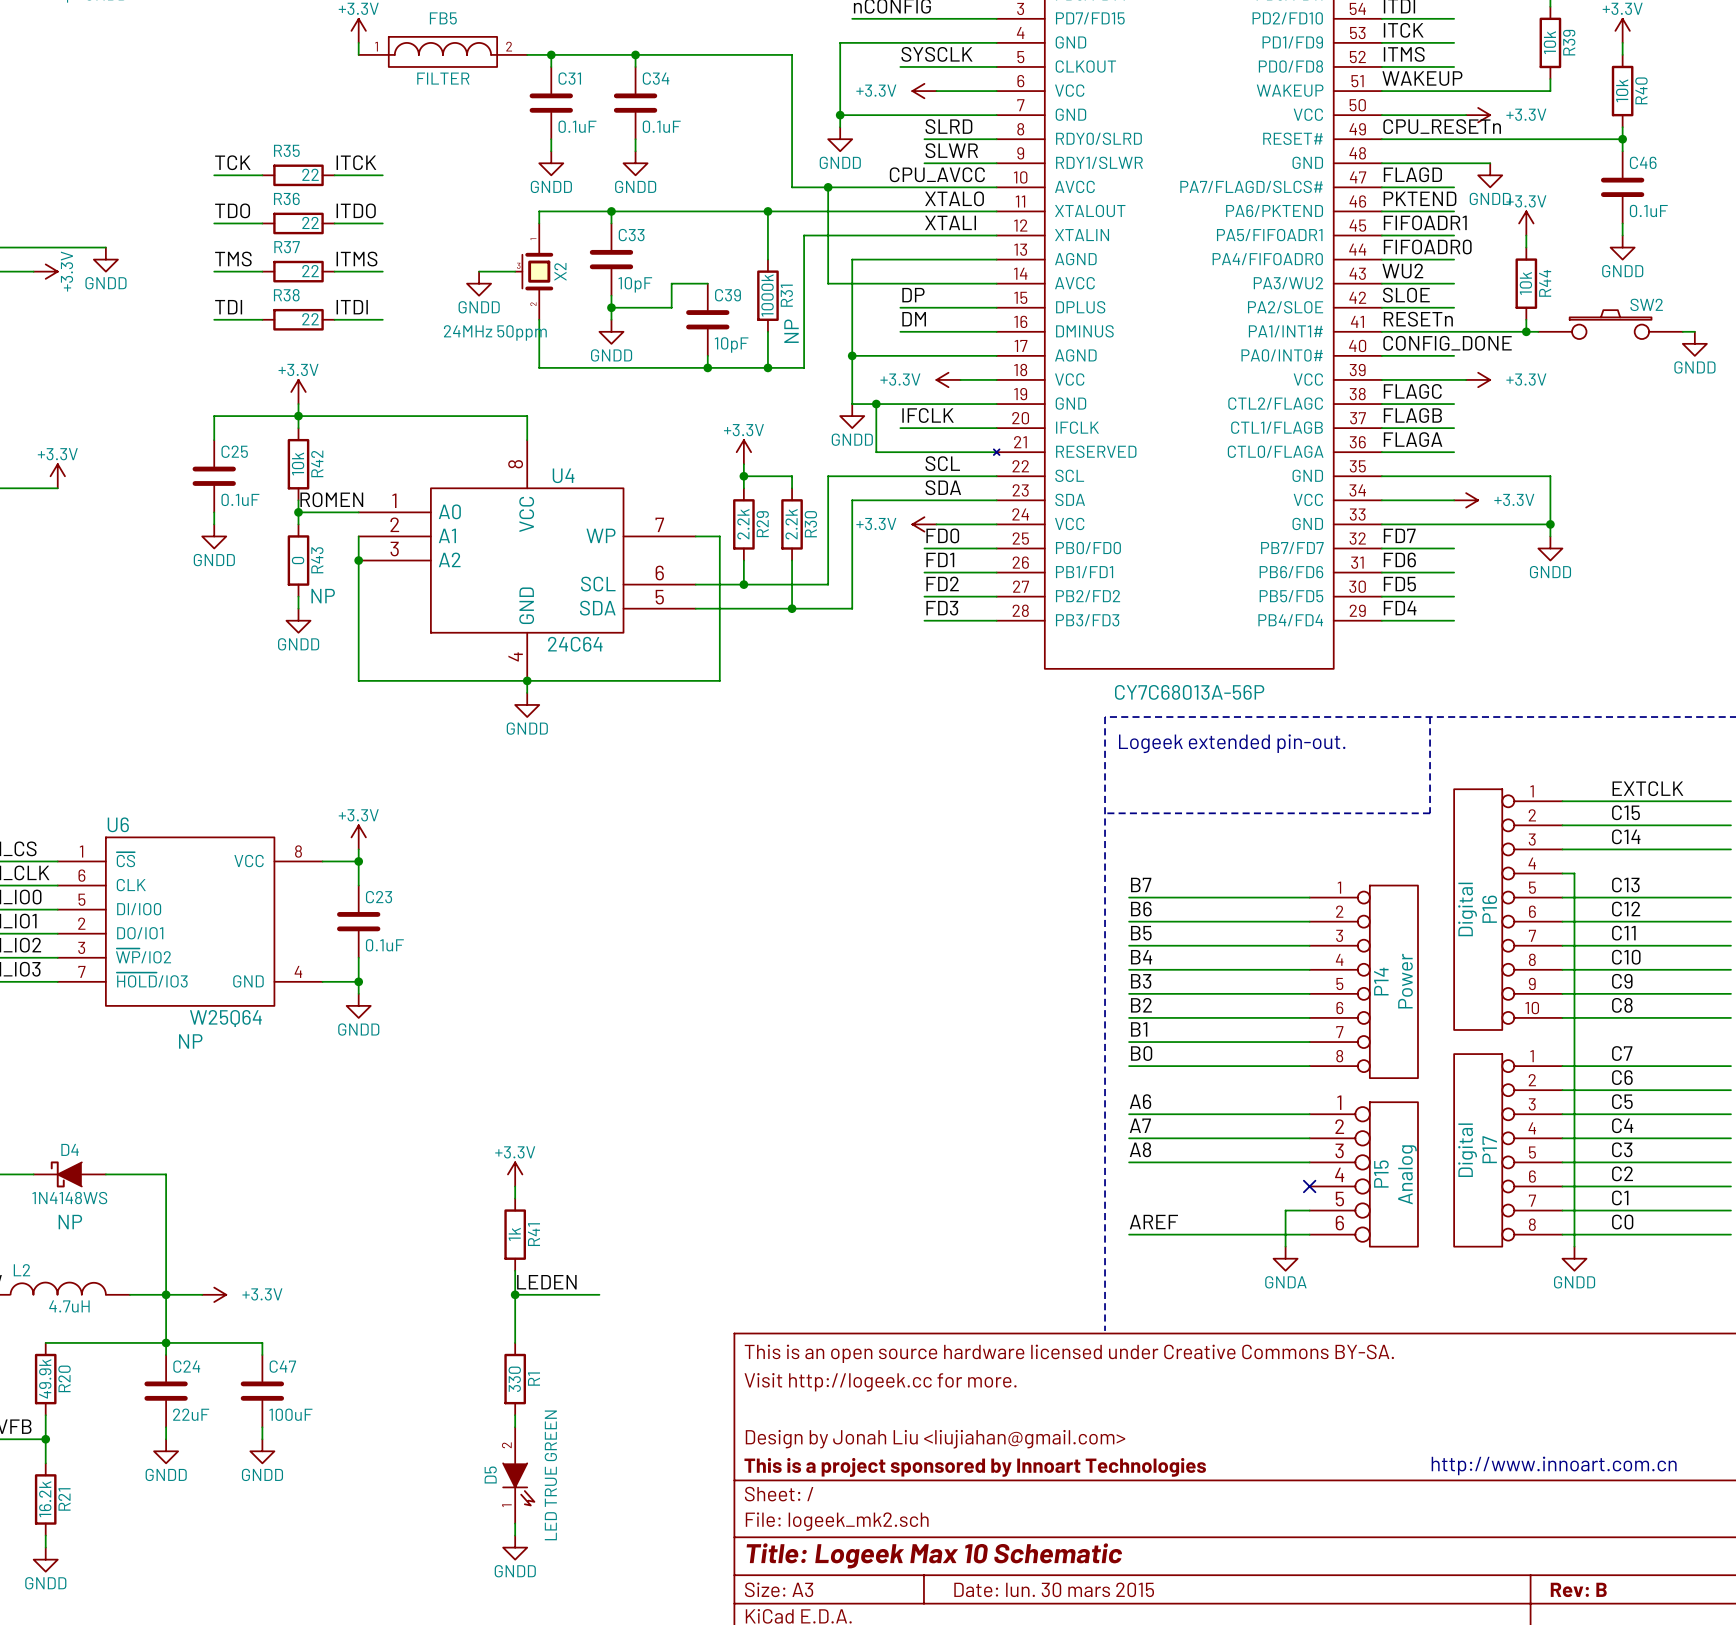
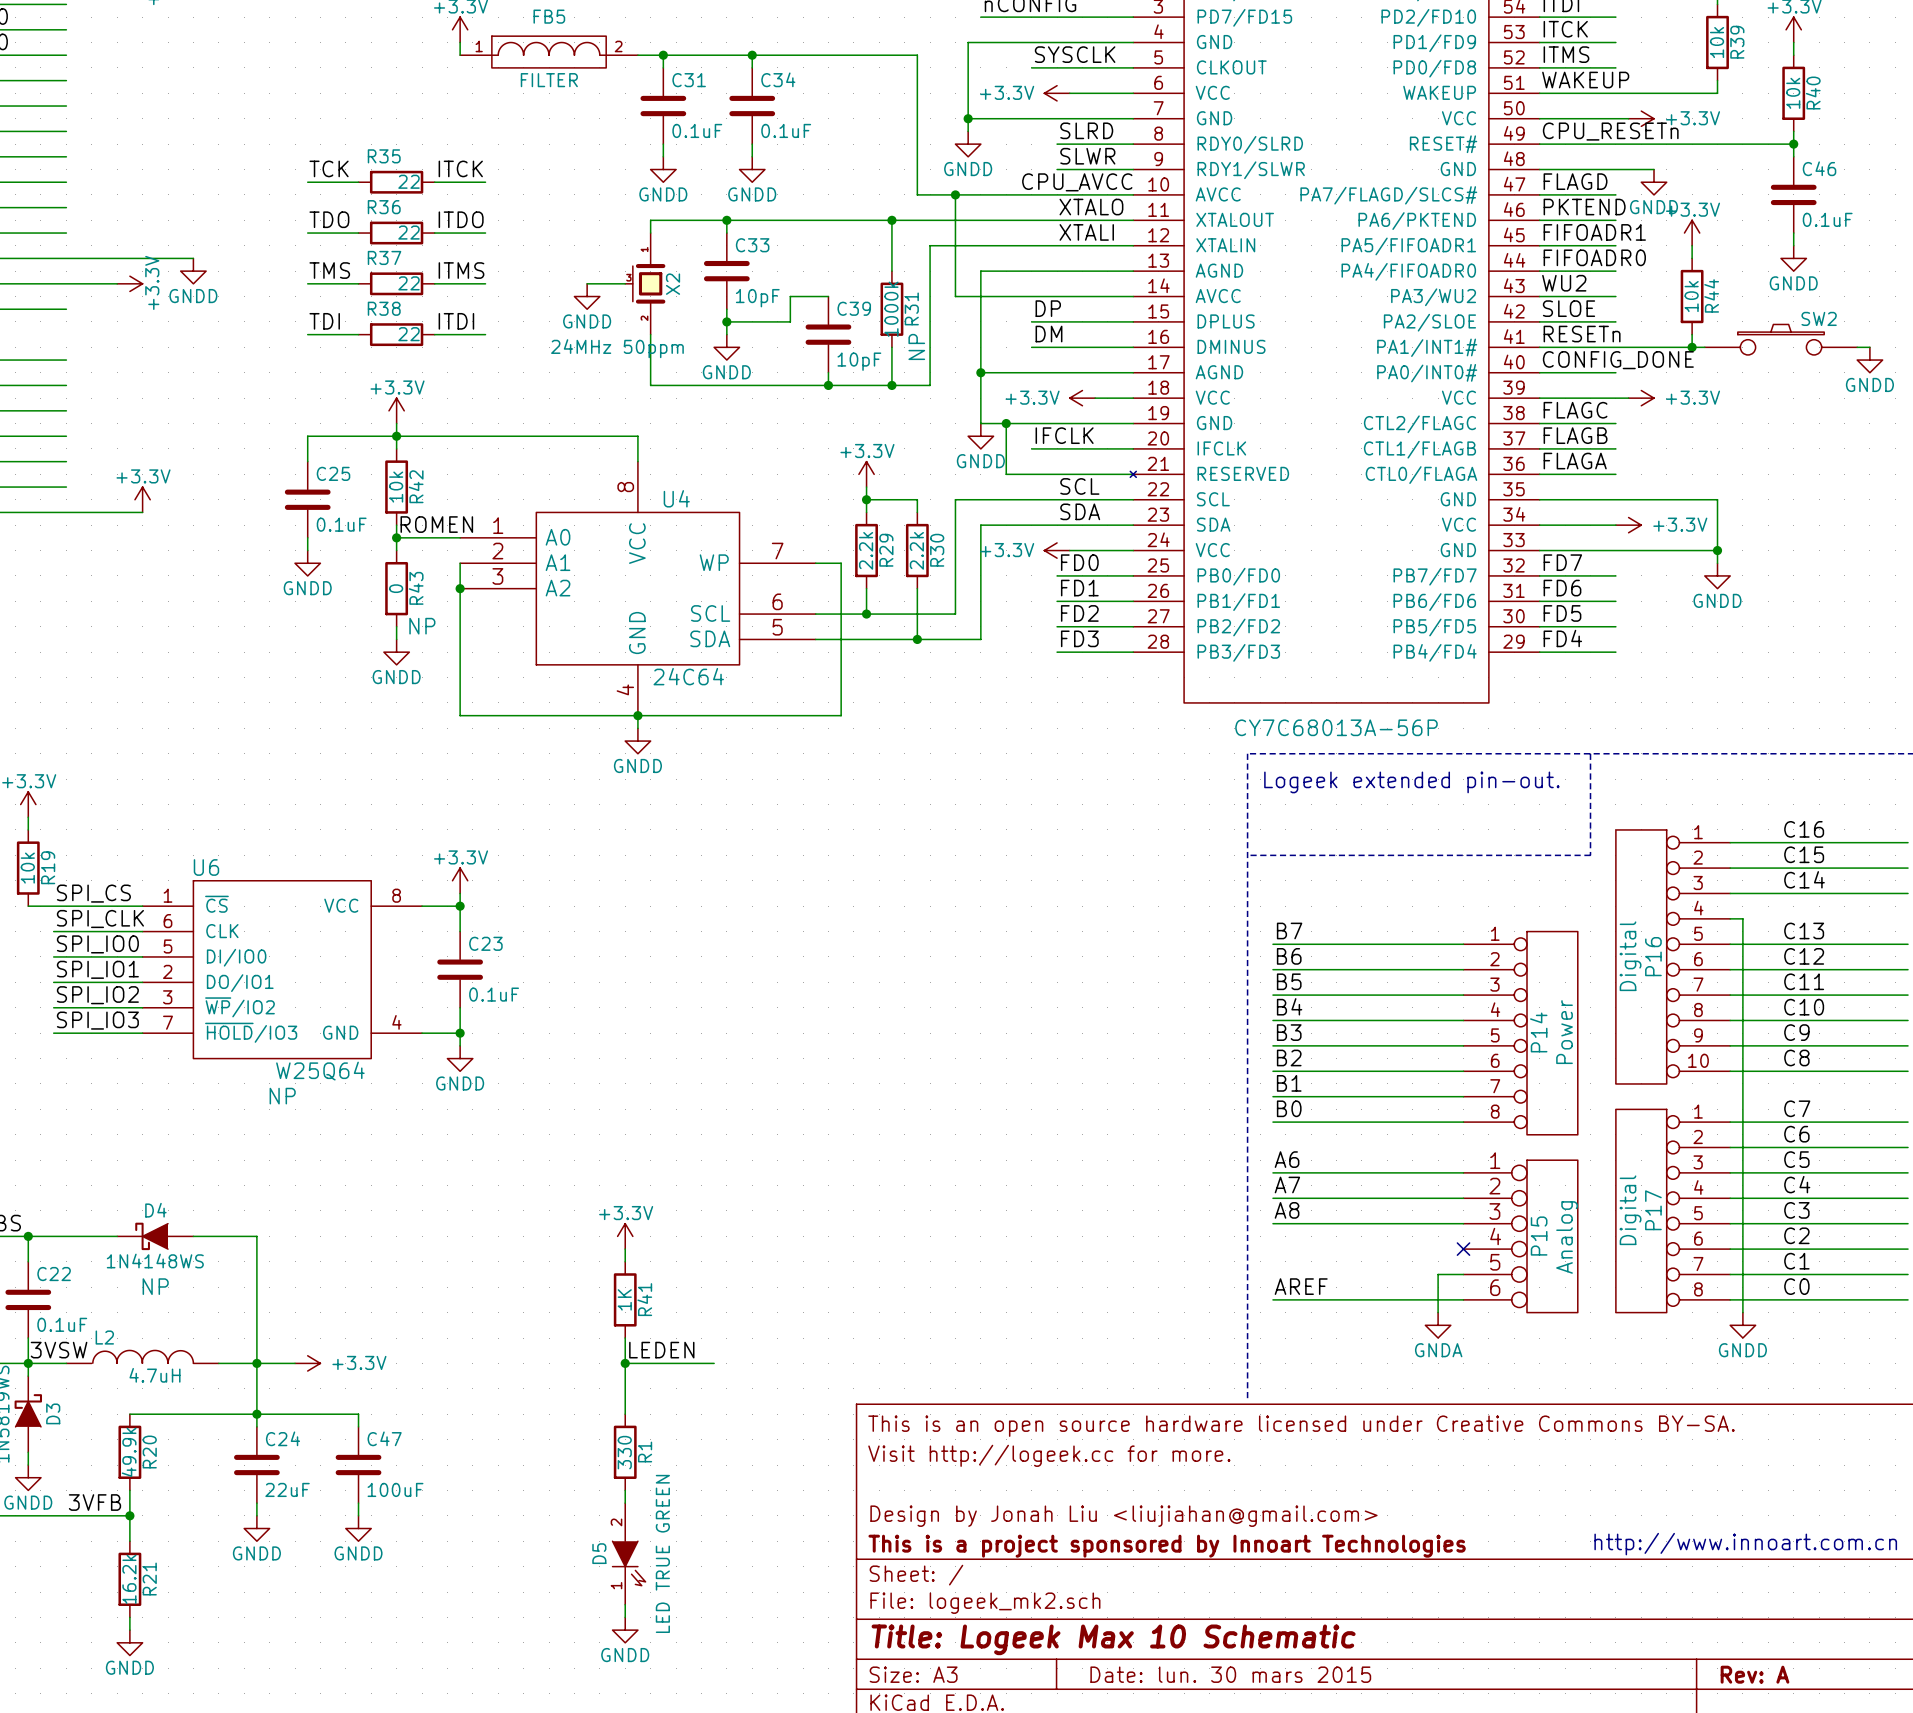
label: EXTCLK (1647, 788) -> C16 (1804, 829)
R41 value: 1k (514, 1234) -> 1K (624, 1299)
title block: Rev: B (1578, 1589) -> Rev: A (1755, 1674)

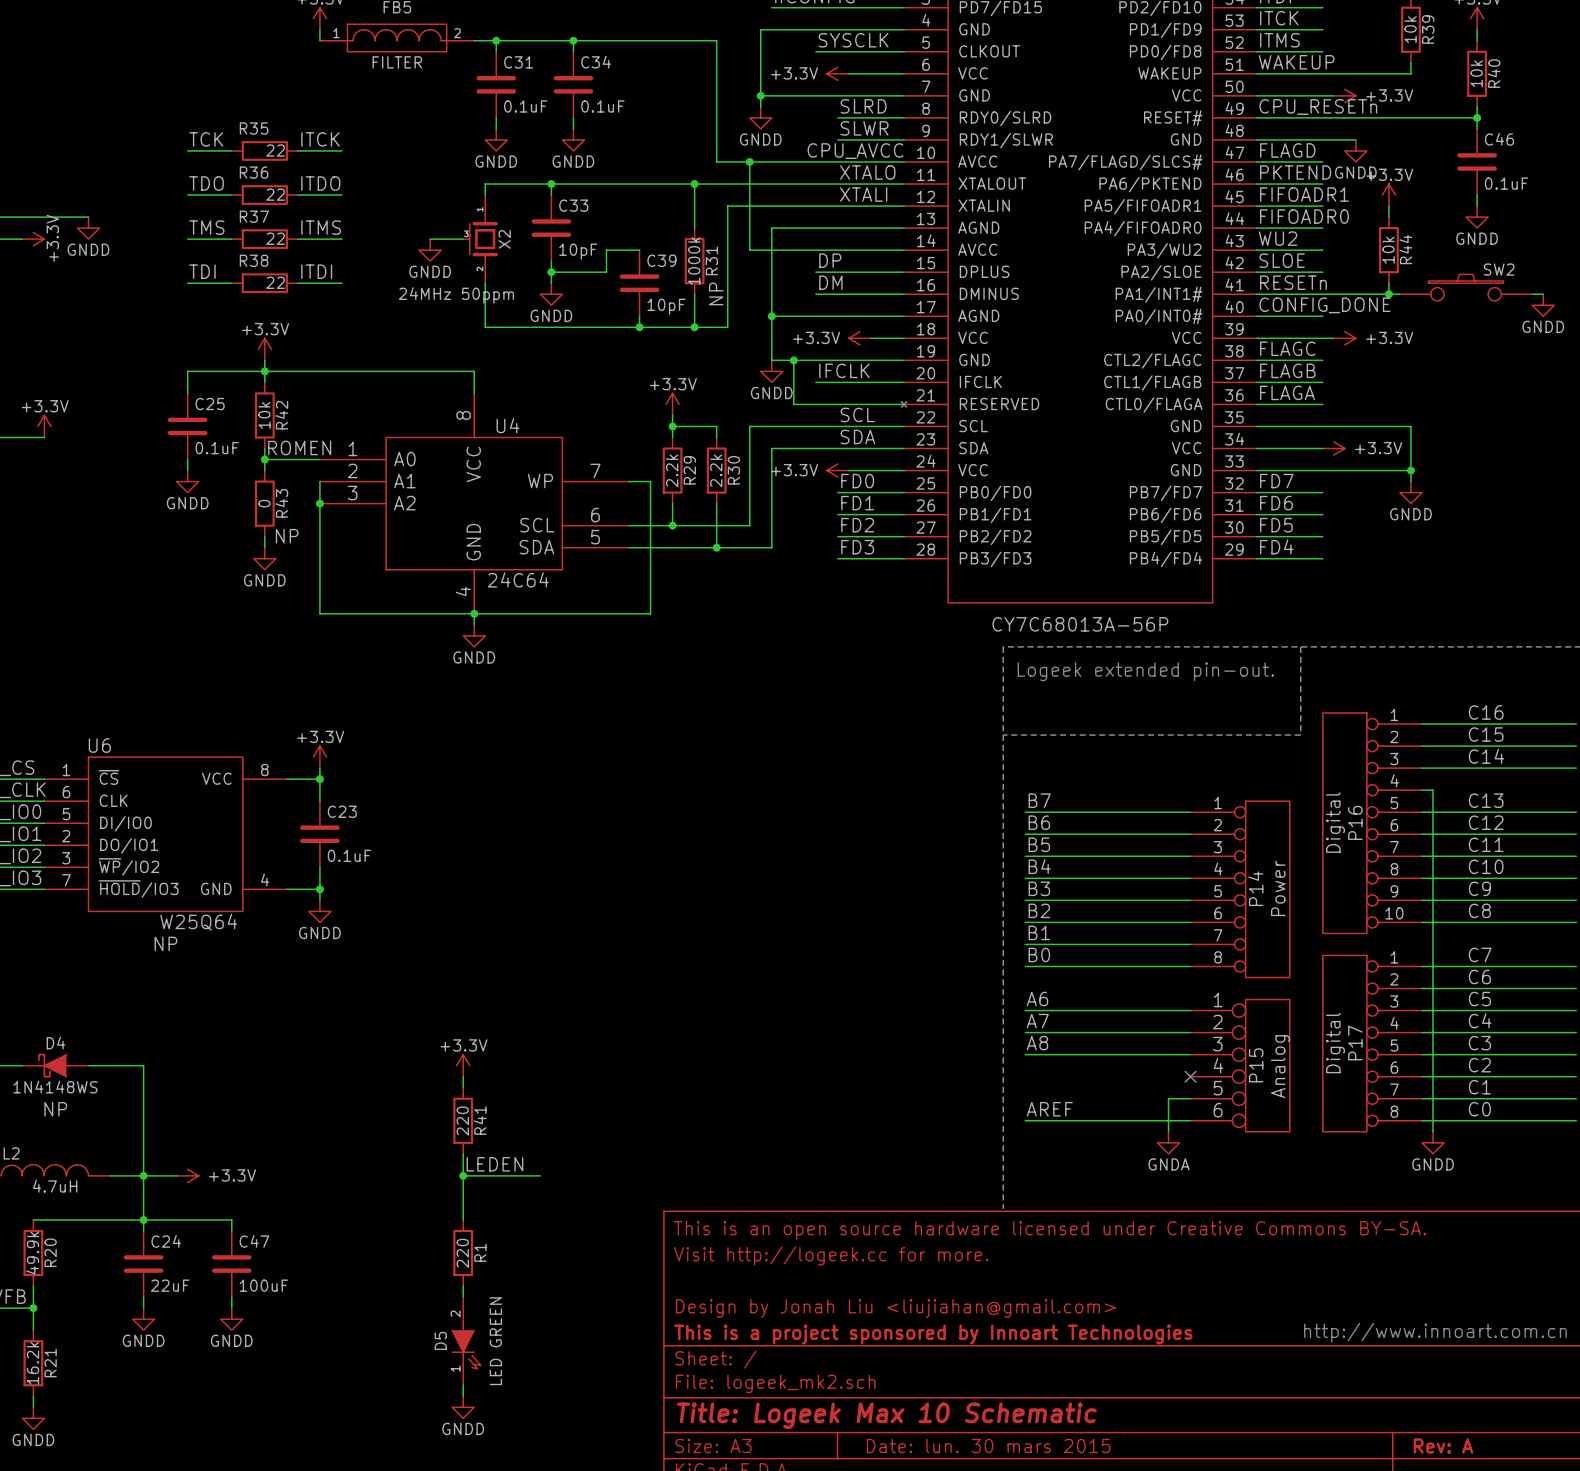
R41 value: 1K (624, 1299) -> 220 (462, 1121)
R1 value: 330 (624, 1452) -> 220 (462, 1253)
D5 value: LED TRUE GREEN (662, 1553) -> LED GREEN (495, 1341)

